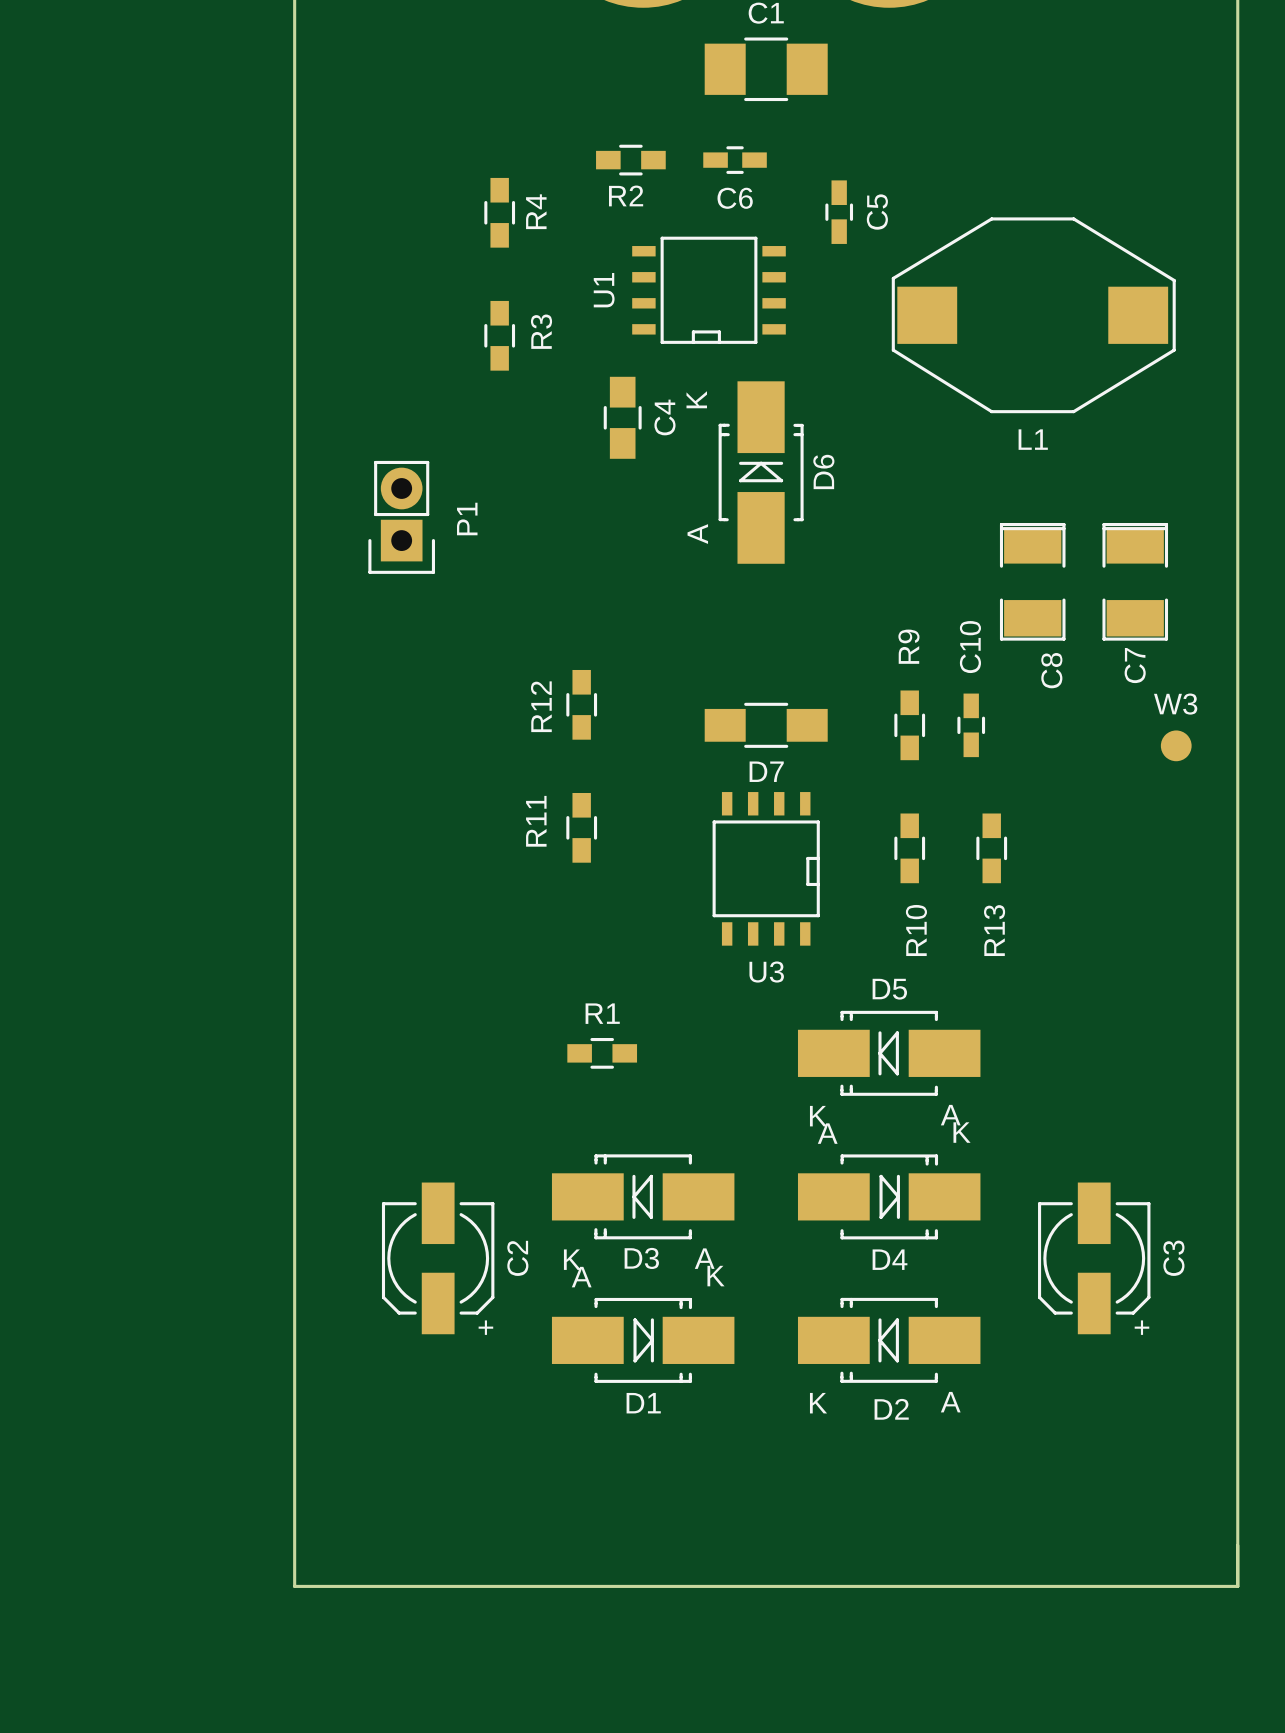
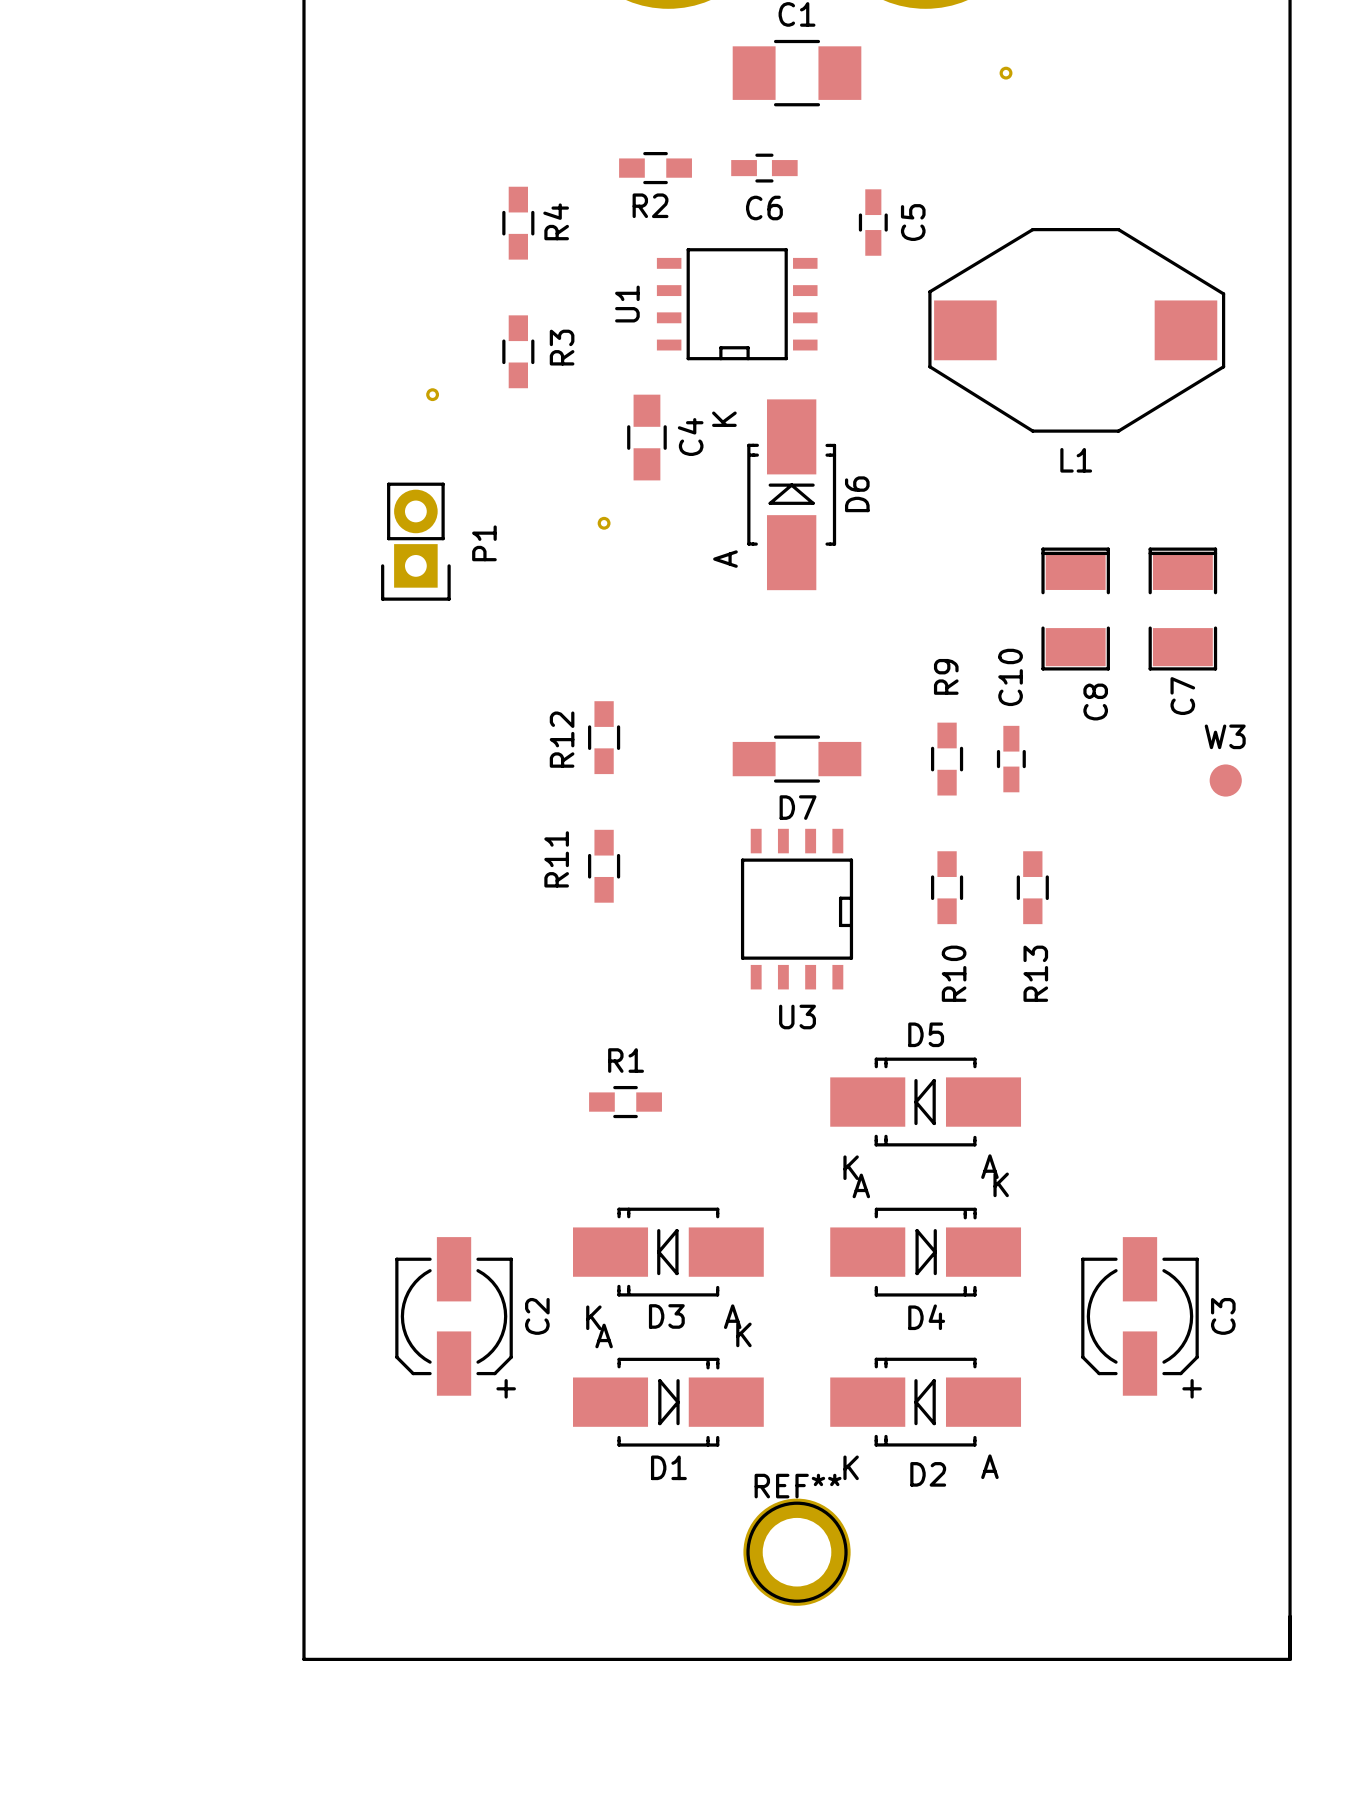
part: none -> (1006, 73)
part: none -> (432, 394)
part: none -> (604, 523)
REF**: none -> (797, 1552)

